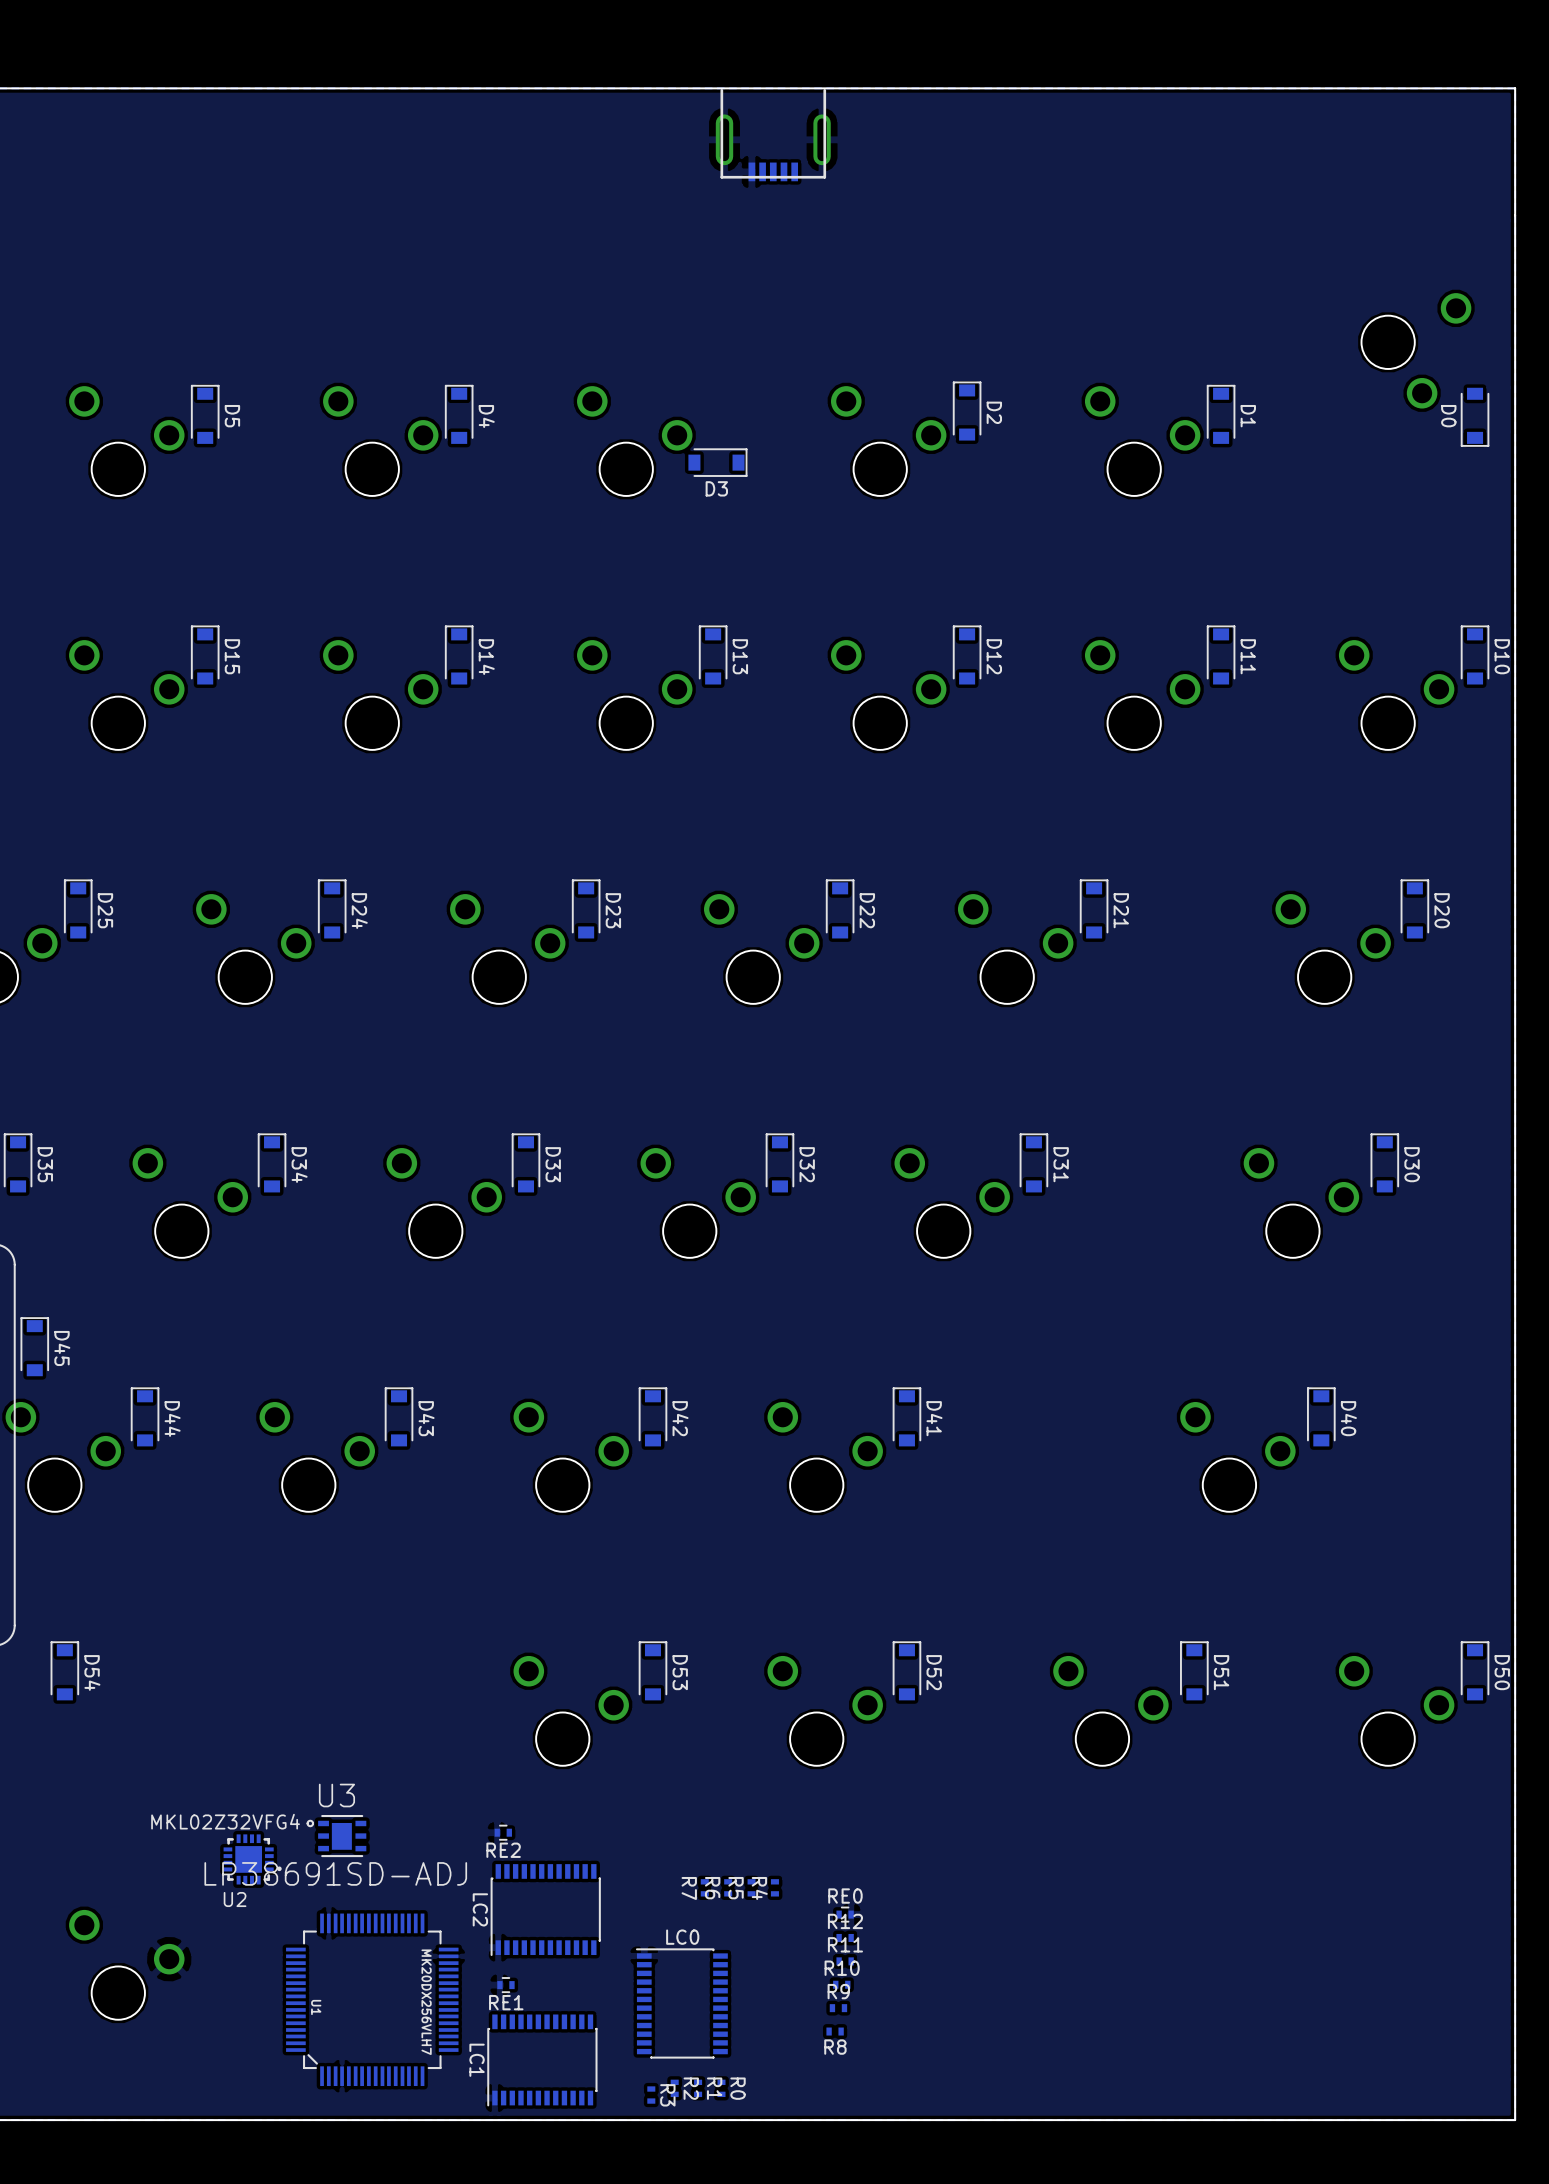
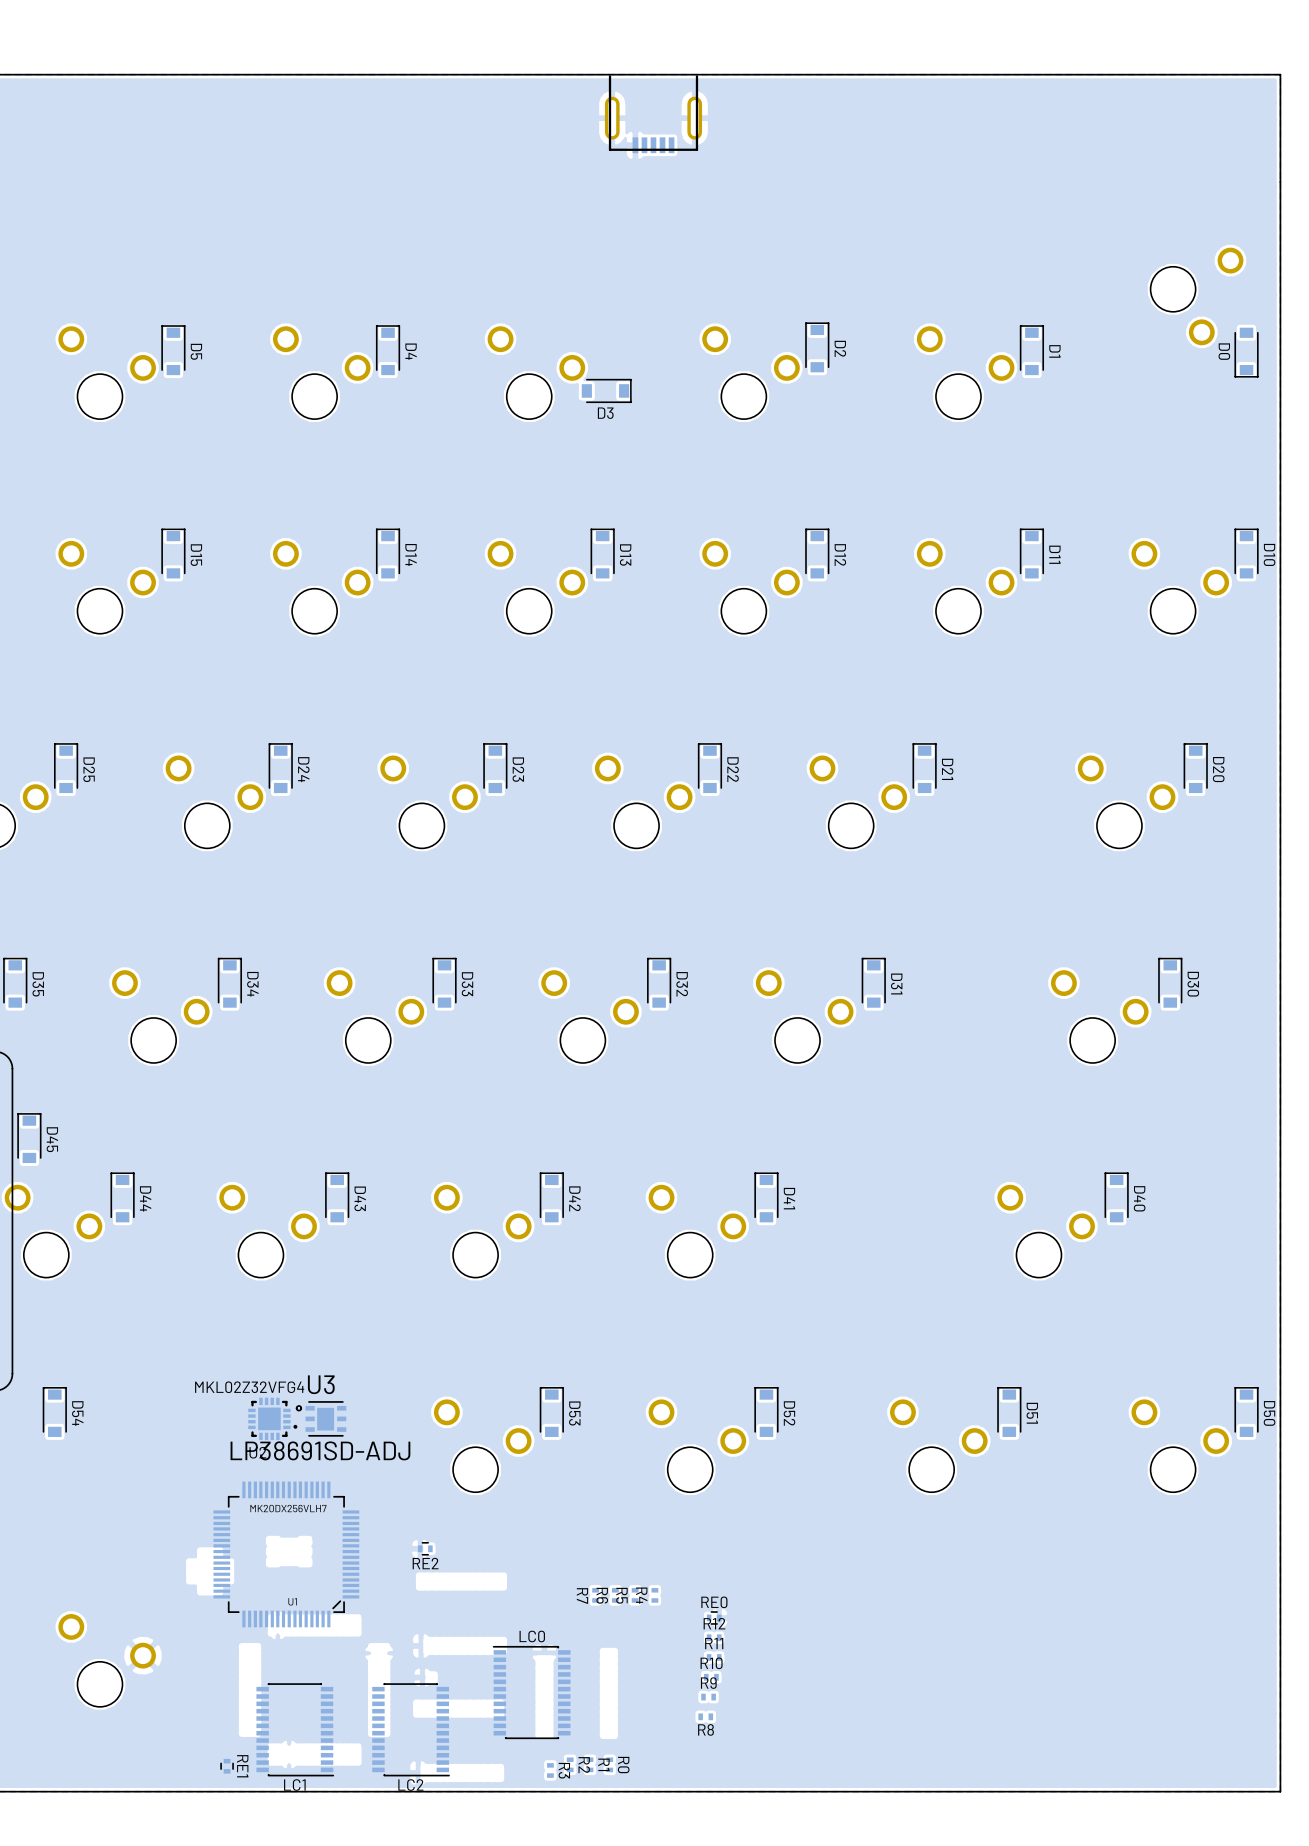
U3 position: (336, 1836) -> (321, 1418)
U2 position: (252, 1859) -> (272, 1418)
LC2 rotation: 0° (545, 1910) -> 90° counterclockwise (411, 1729)
LC2 position: (545, 1910) -> (411, 1729)
RE1 rotation: 0° (505, 1985) -> 90° clockwise (227, 1766)
RE1 position: (505, 1985) -> (227, 1766)
U1 rotation: 0° (372, 1999) -> 90° counterclockwise (286, 1554)
U1 position: (372, 1999) -> (286, 1554)
LC0 position: (681, 2003) -> (531, 1692)
LC1 rotation: 0° (542, 2060) -> 90° counterclockwise (295, 1729)
LC1 position: (542, 2060) -> (295, 1729)

